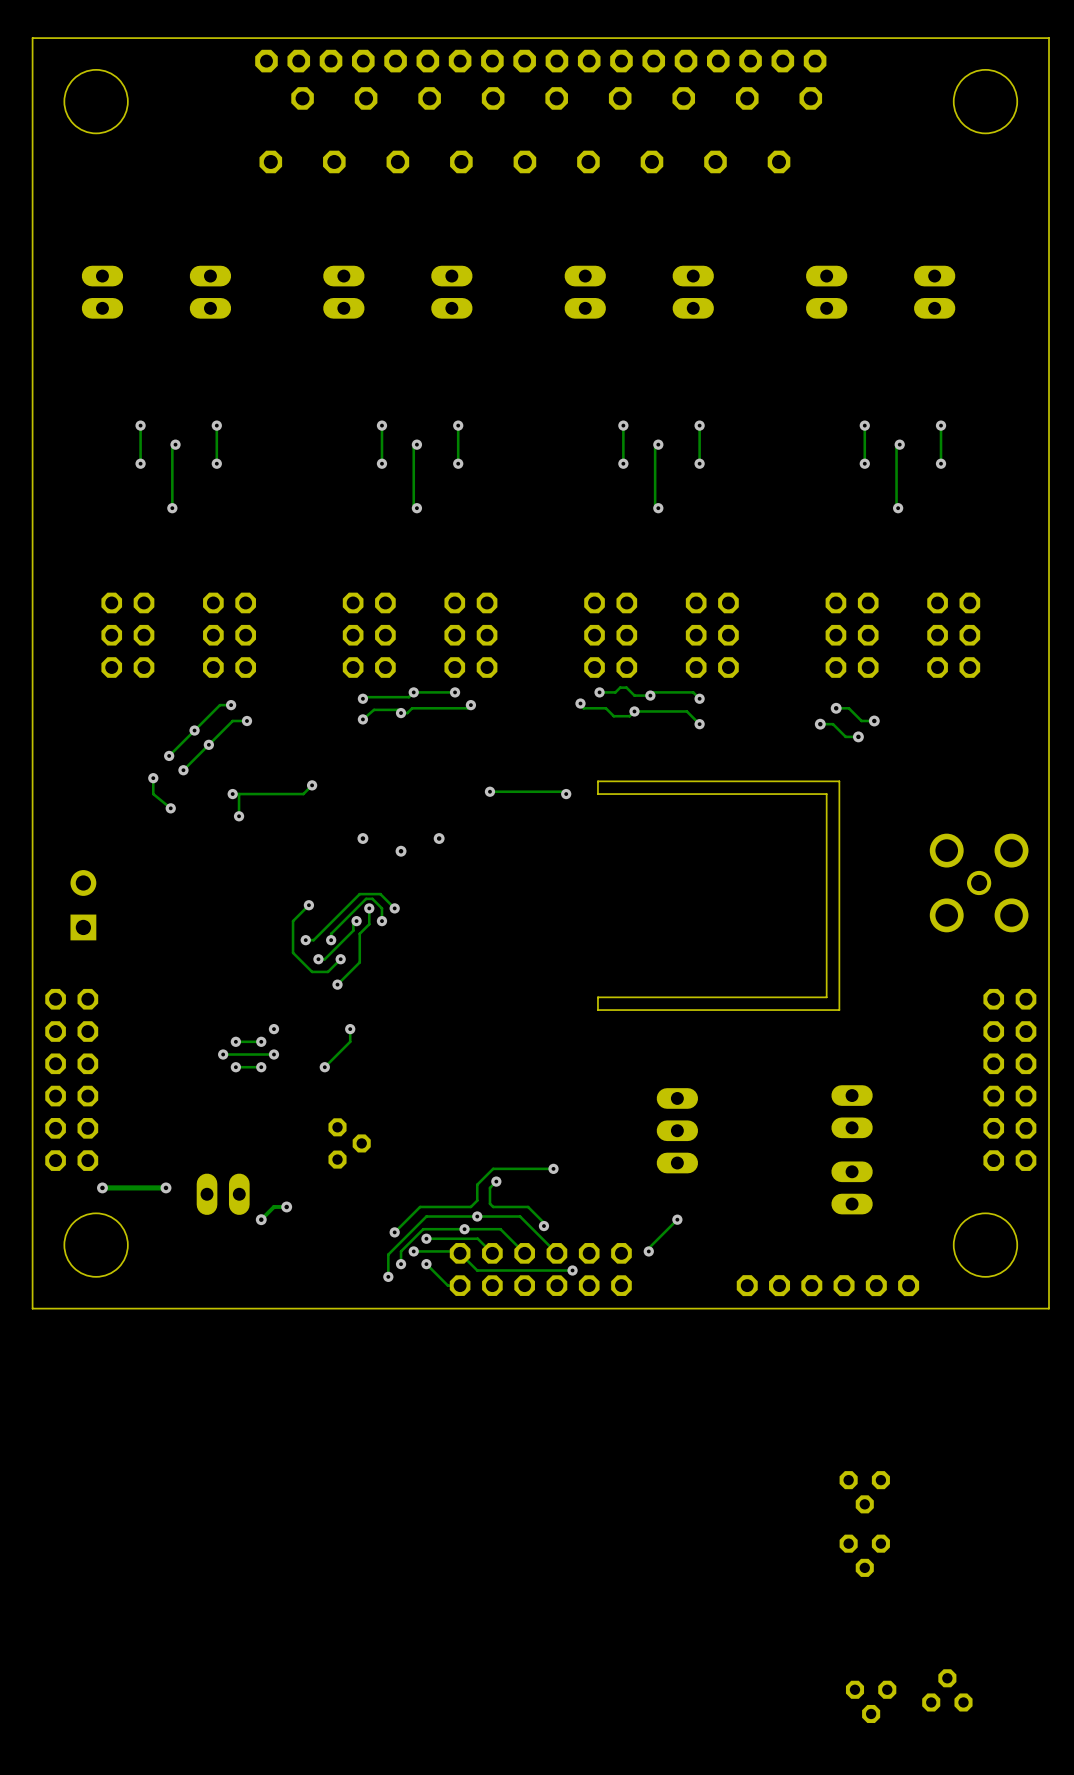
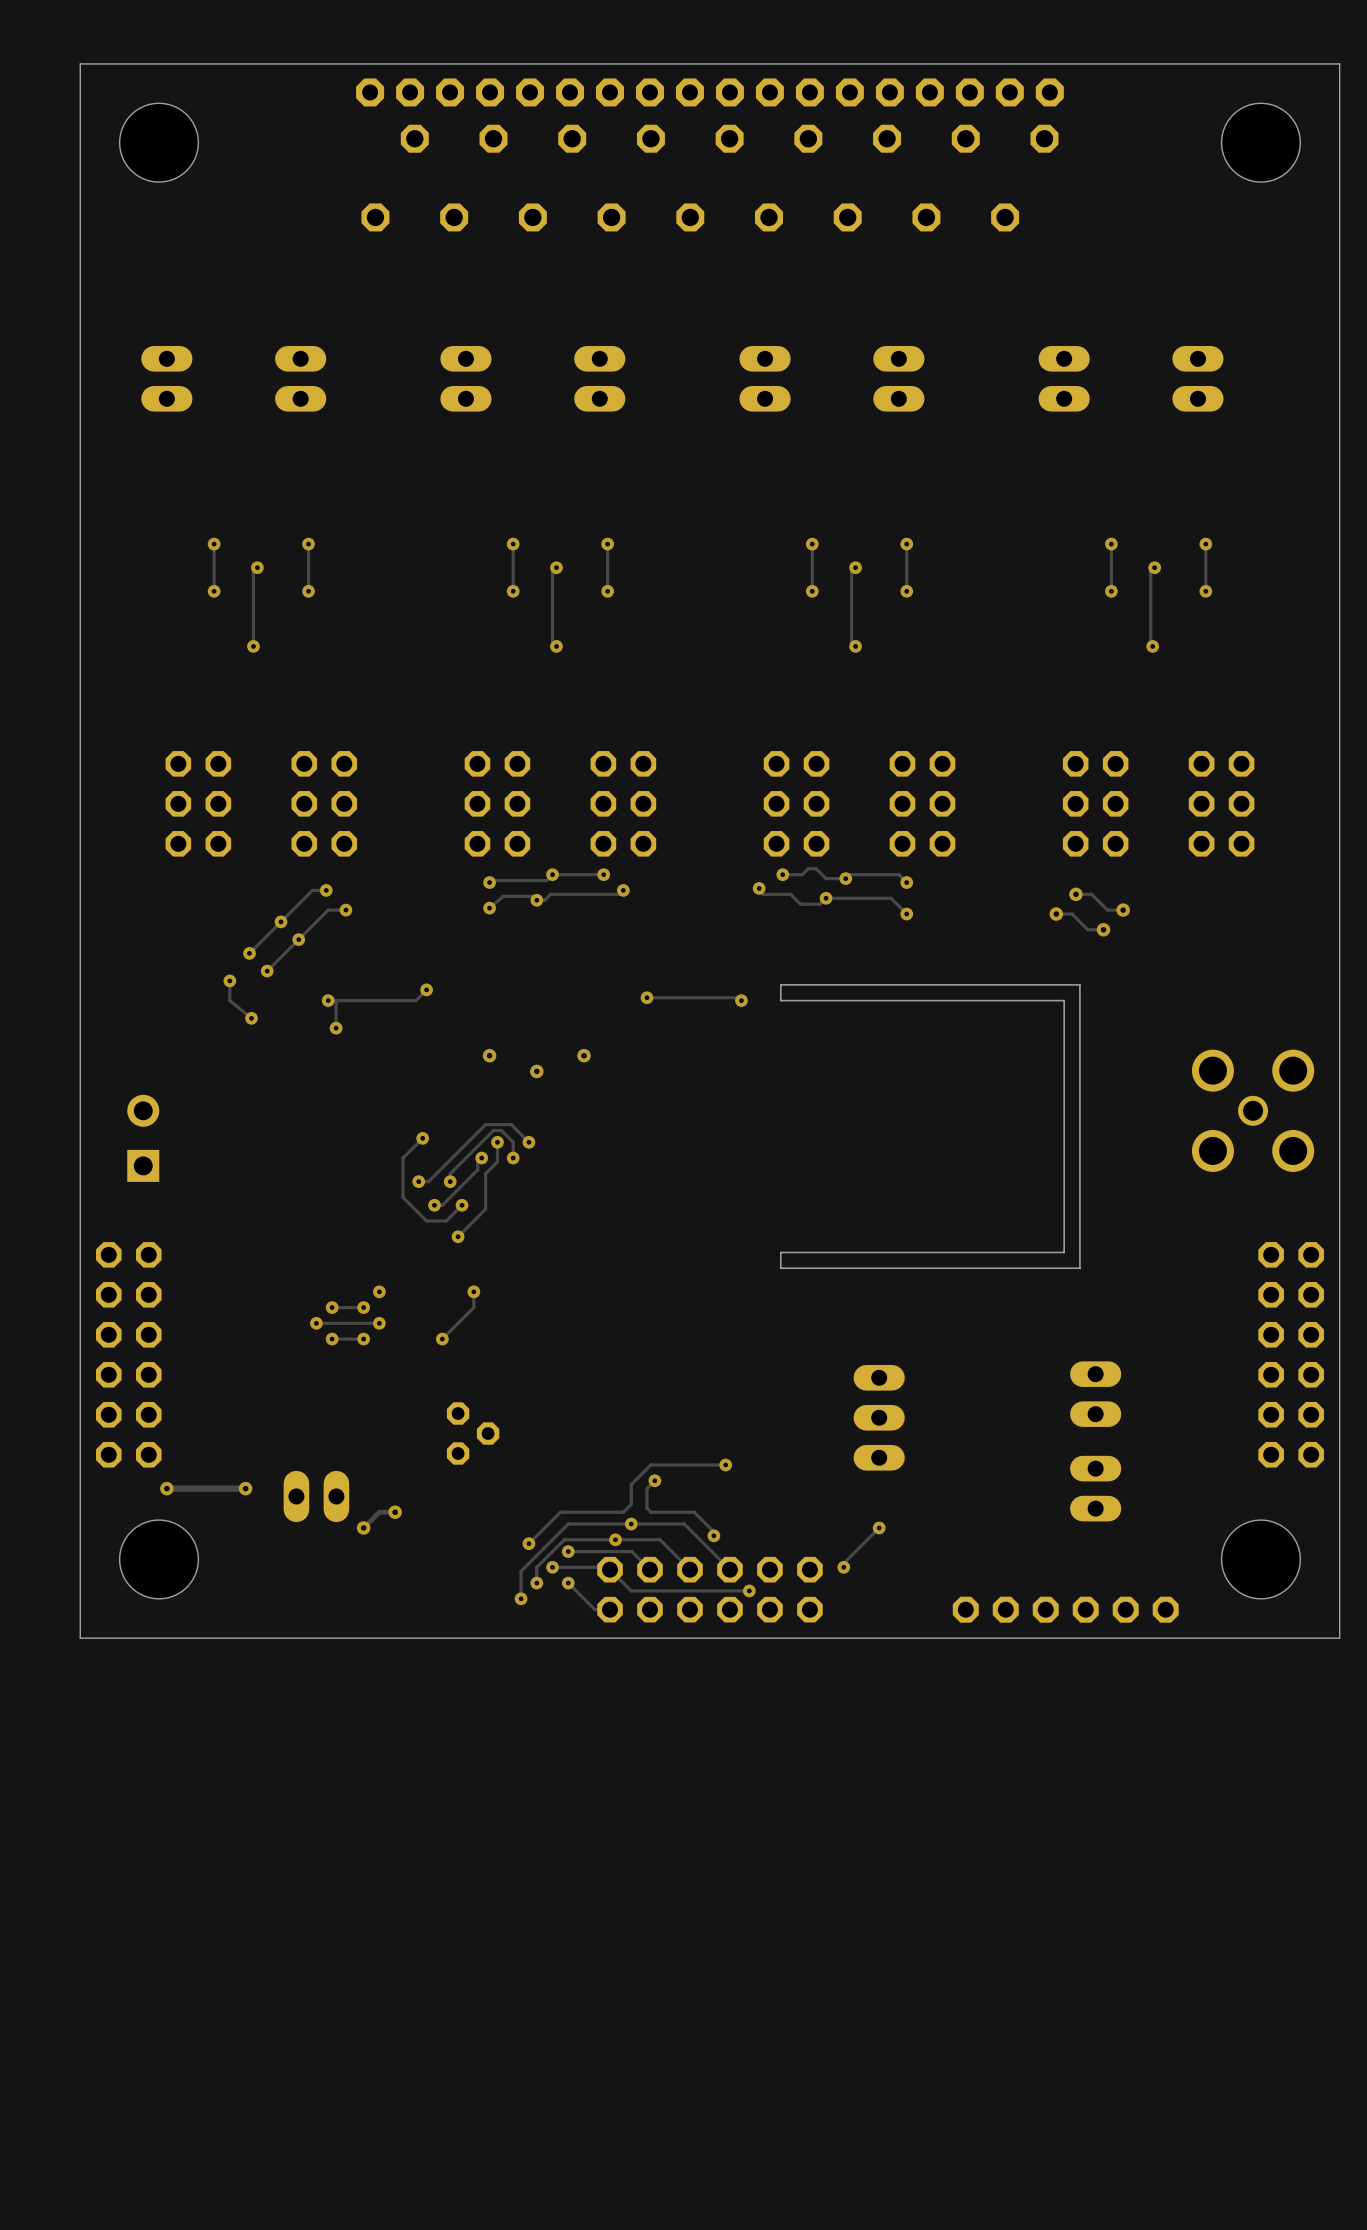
part: (864, 1492) -> none
part: (864, 1555) -> none
part: (947, 1690) -> none
part: (871, 1701) -> none

